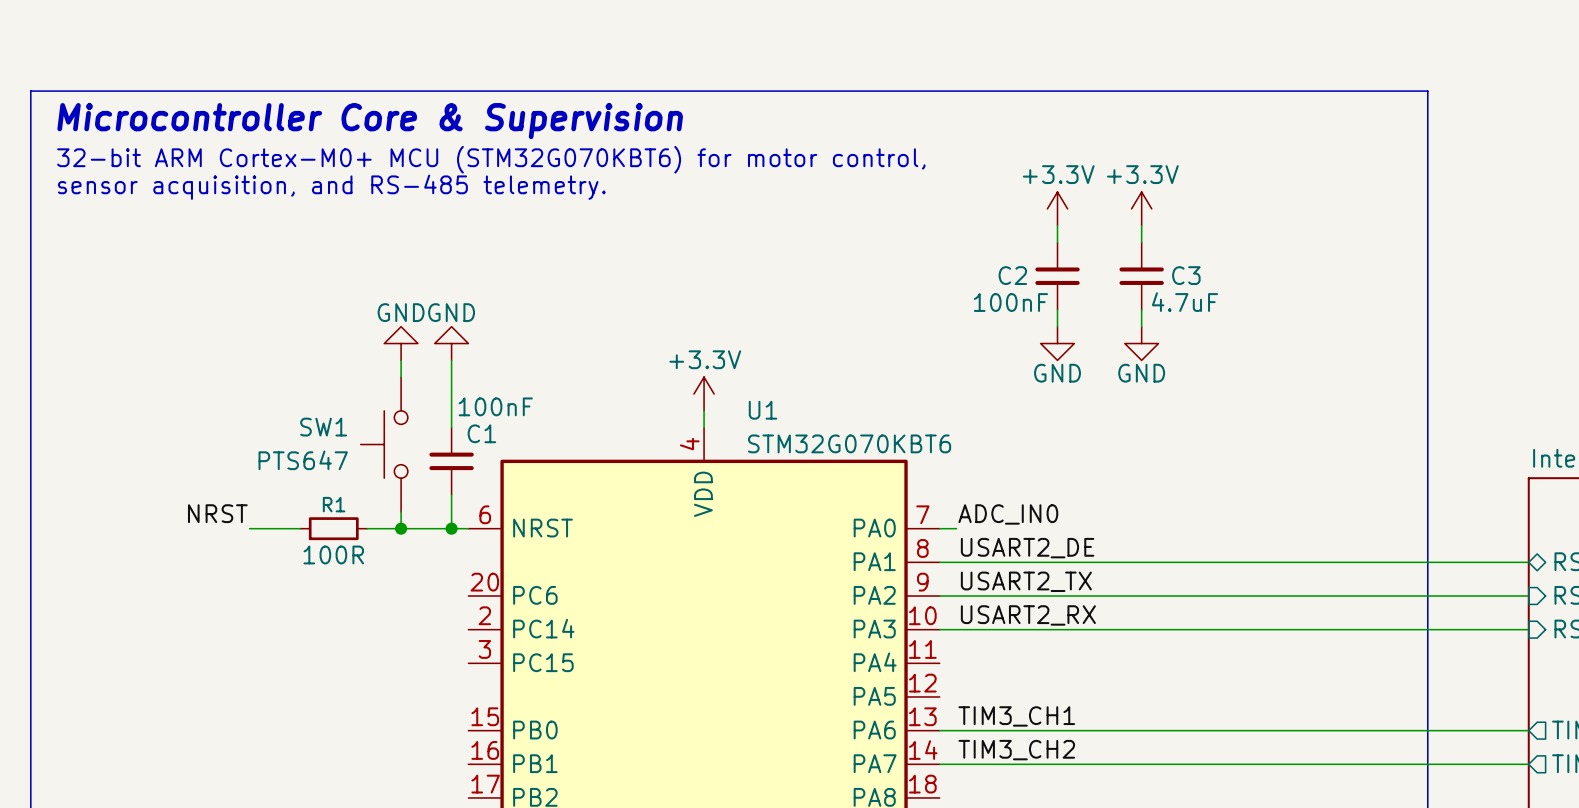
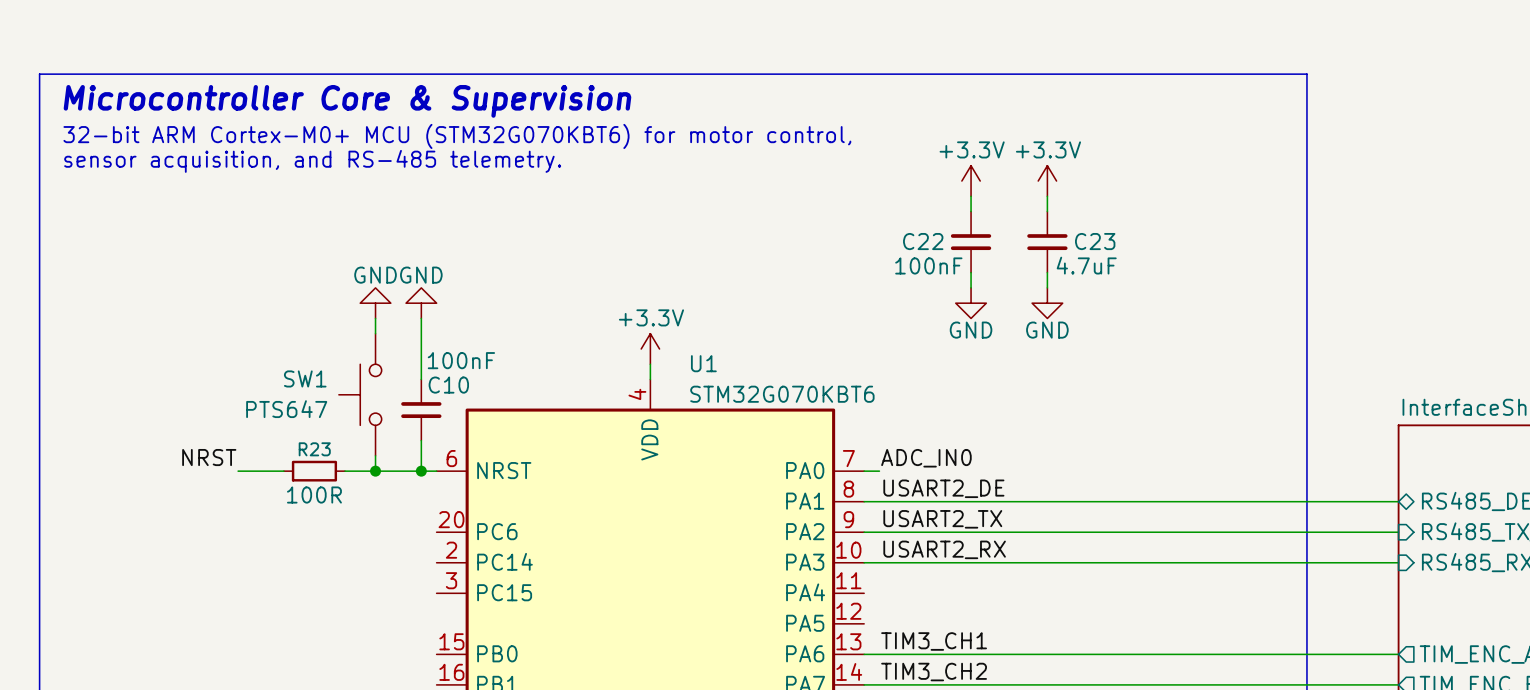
C2 name: C2 (1012, 275) -> C22 (923, 241)
C3 name: C3 (1186, 275) -> C23 (1095, 241)
C1 name: C1 (481, 433) -> C10 (448, 385)
R1 name: R1 (334, 504) -> R23 (314, 449)

